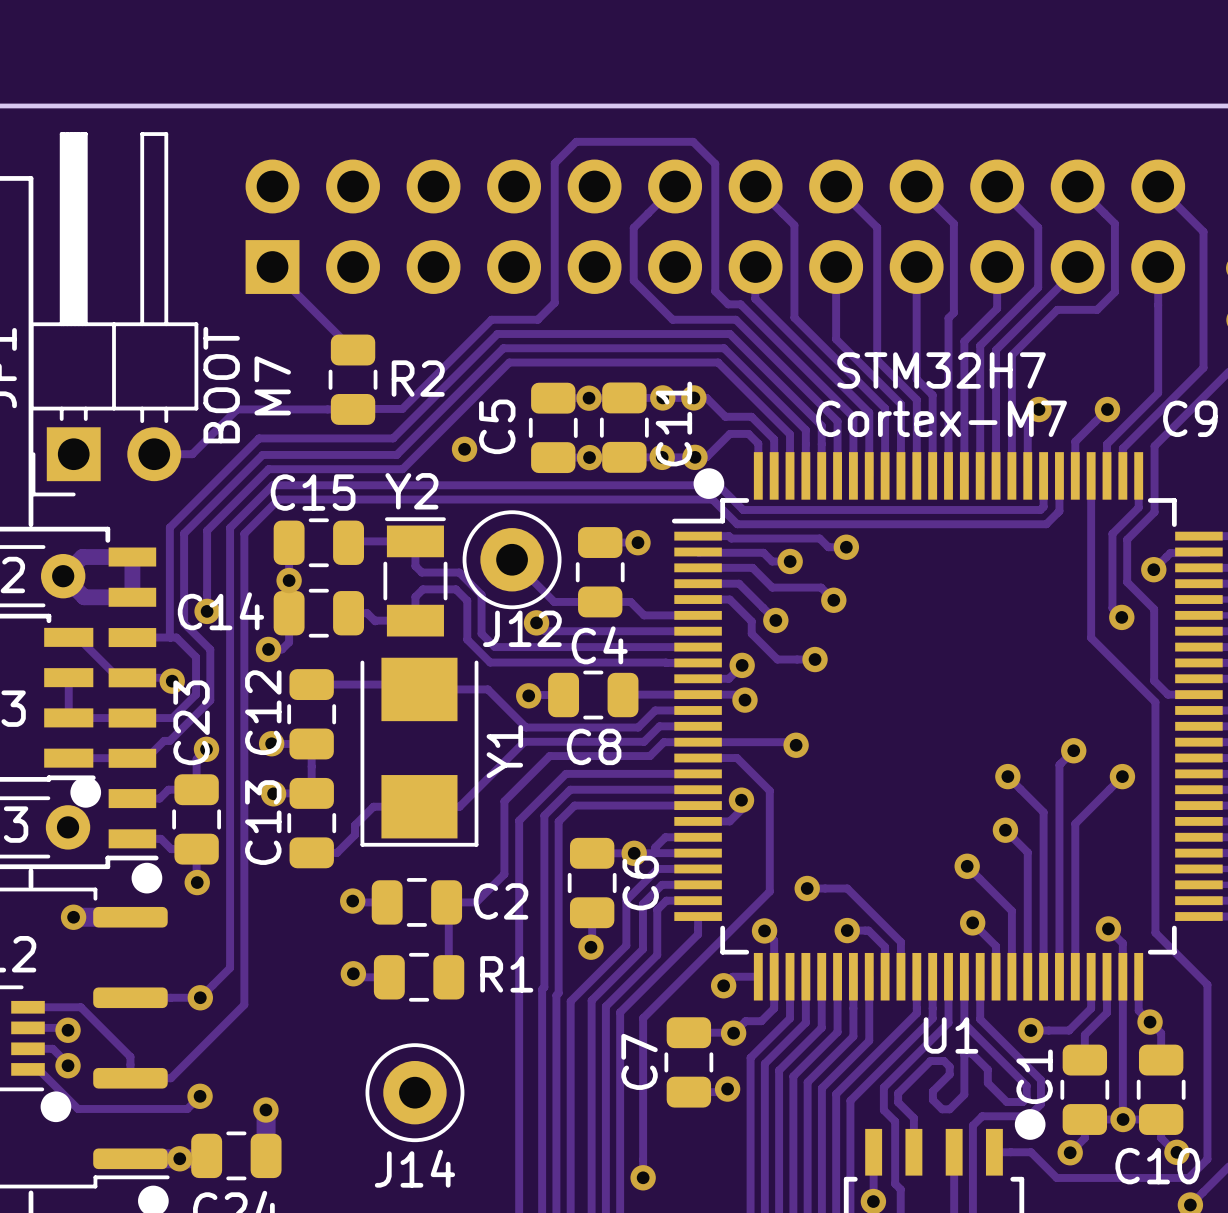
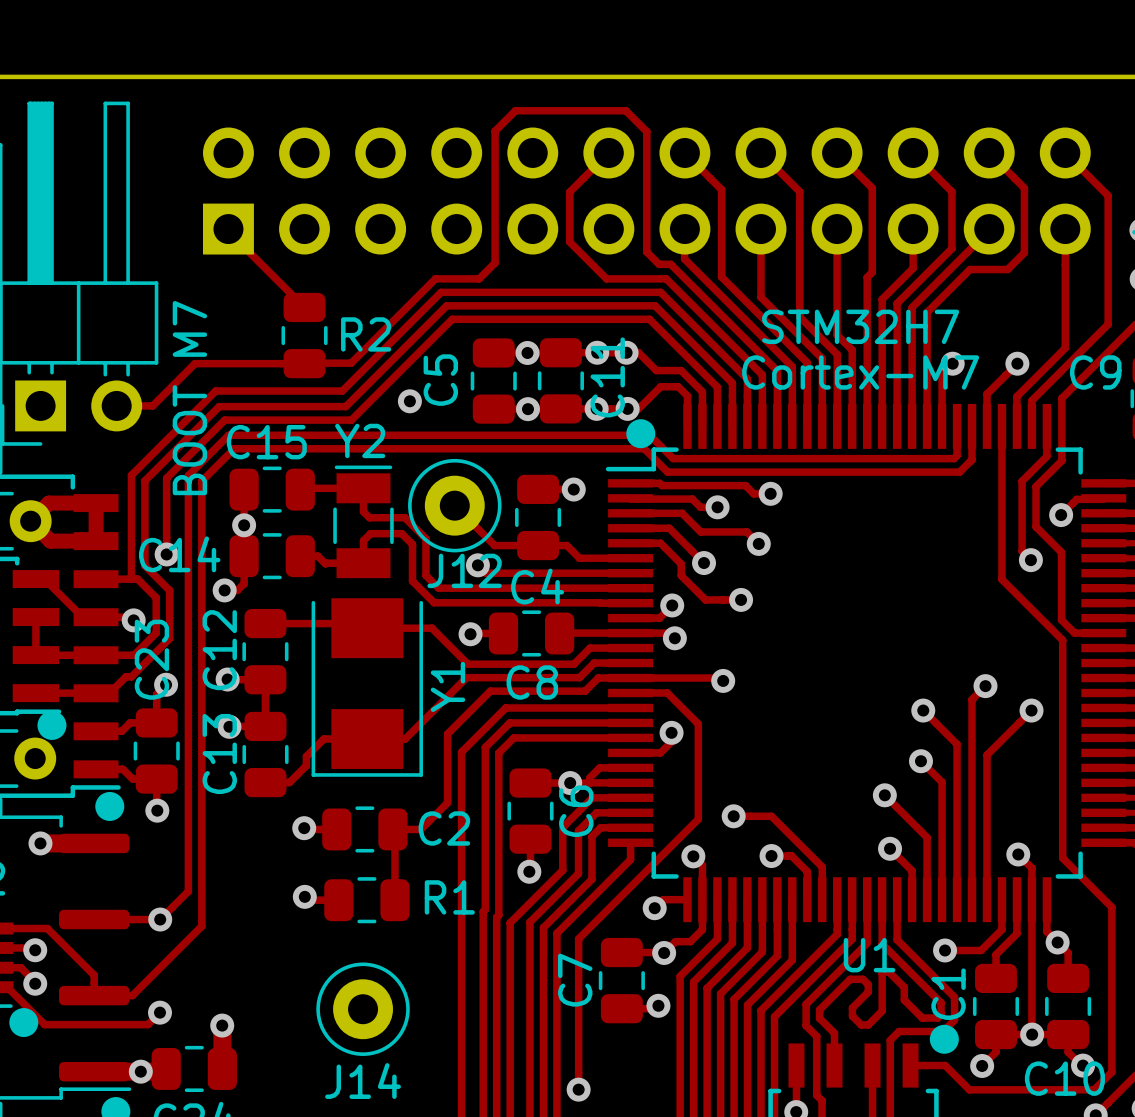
text: BOOT (221, 385) -> BOOT M7 (189, 398)
text: M7 (272, 385) -> none

